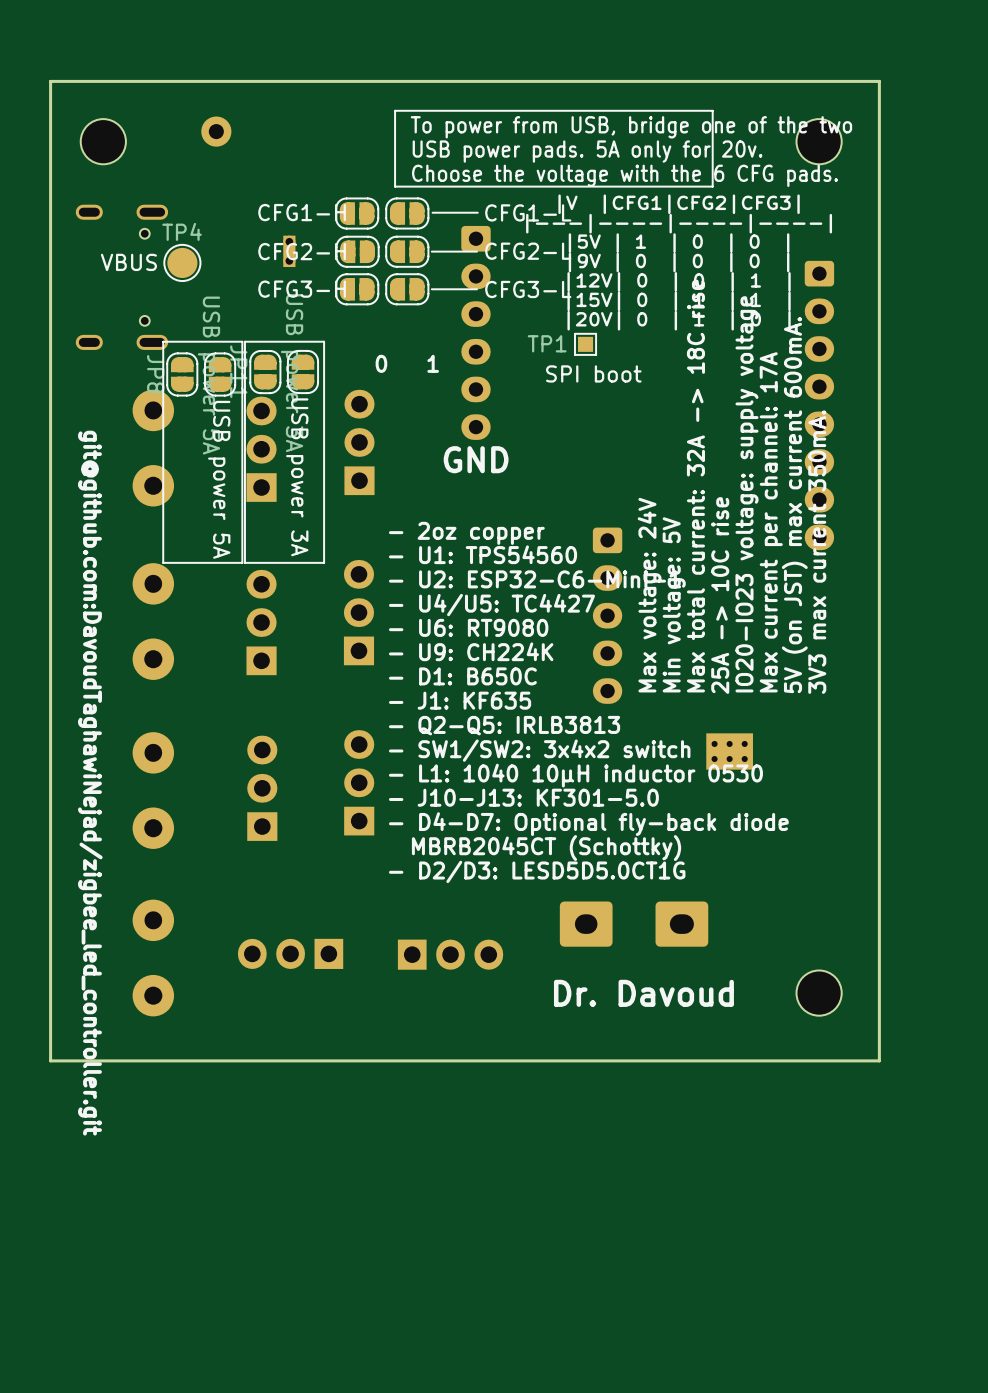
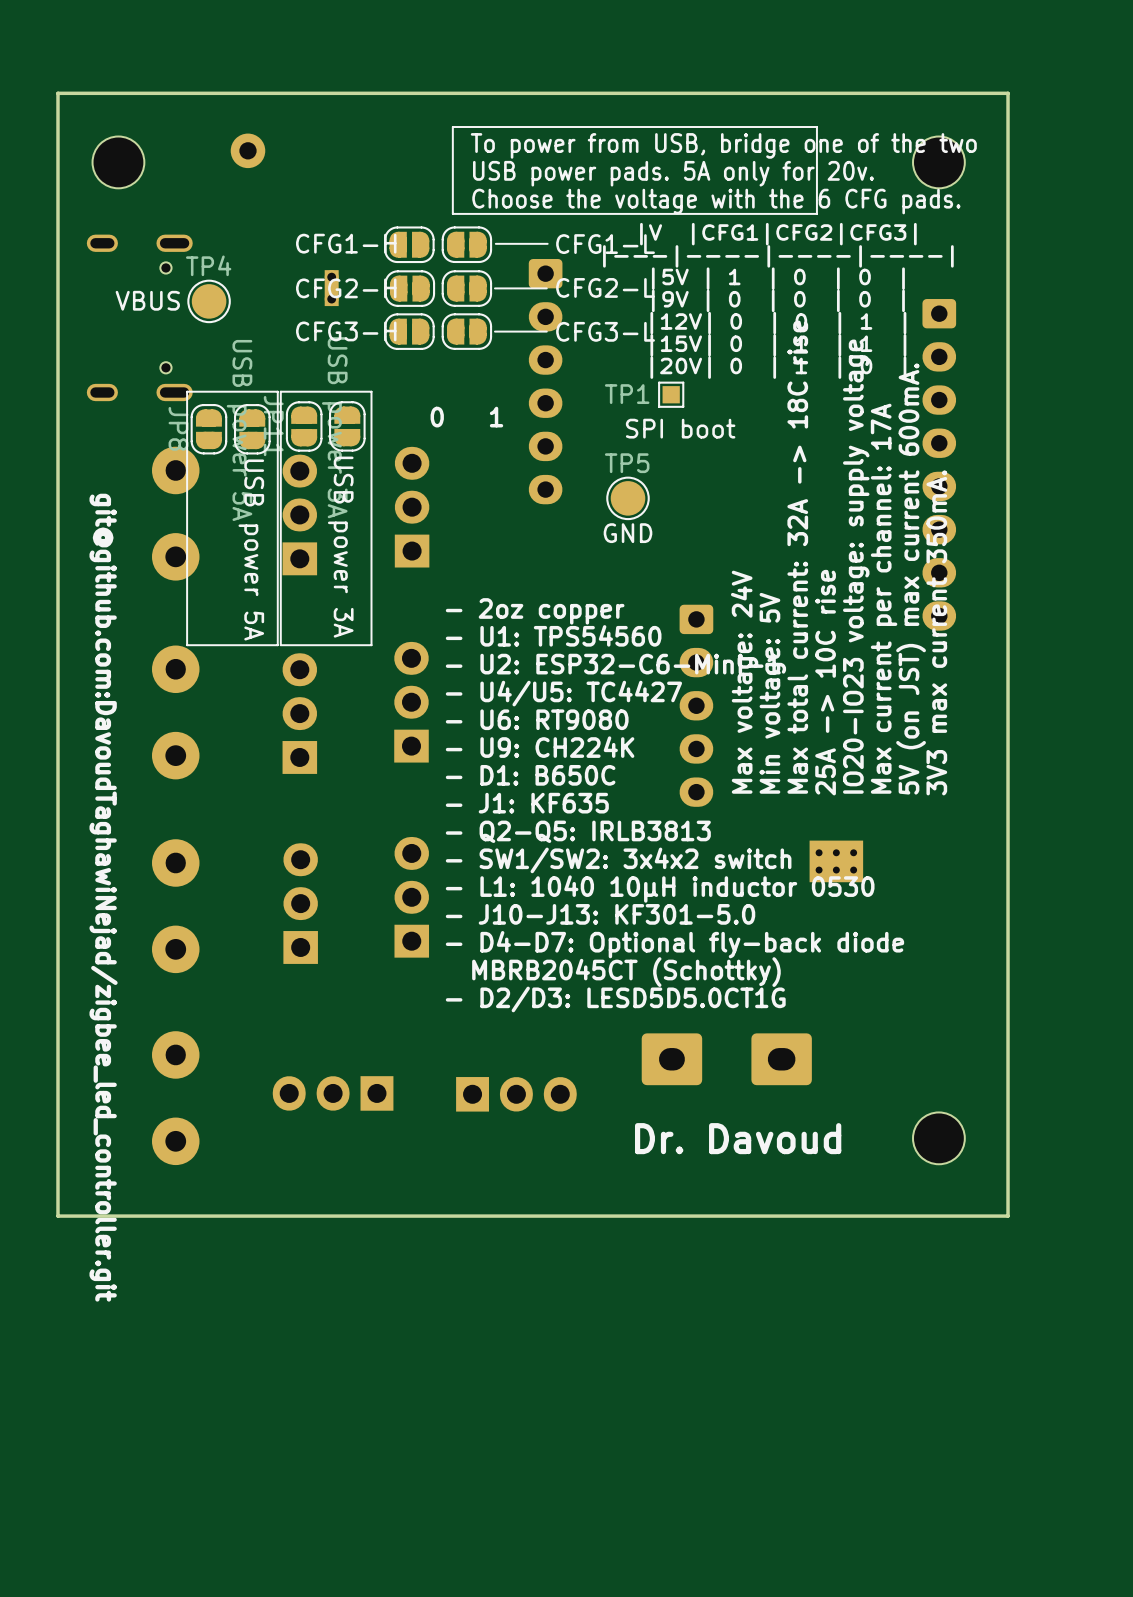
TP5: none -> GND (628, 498)
text: GND (476, 459) -> none

